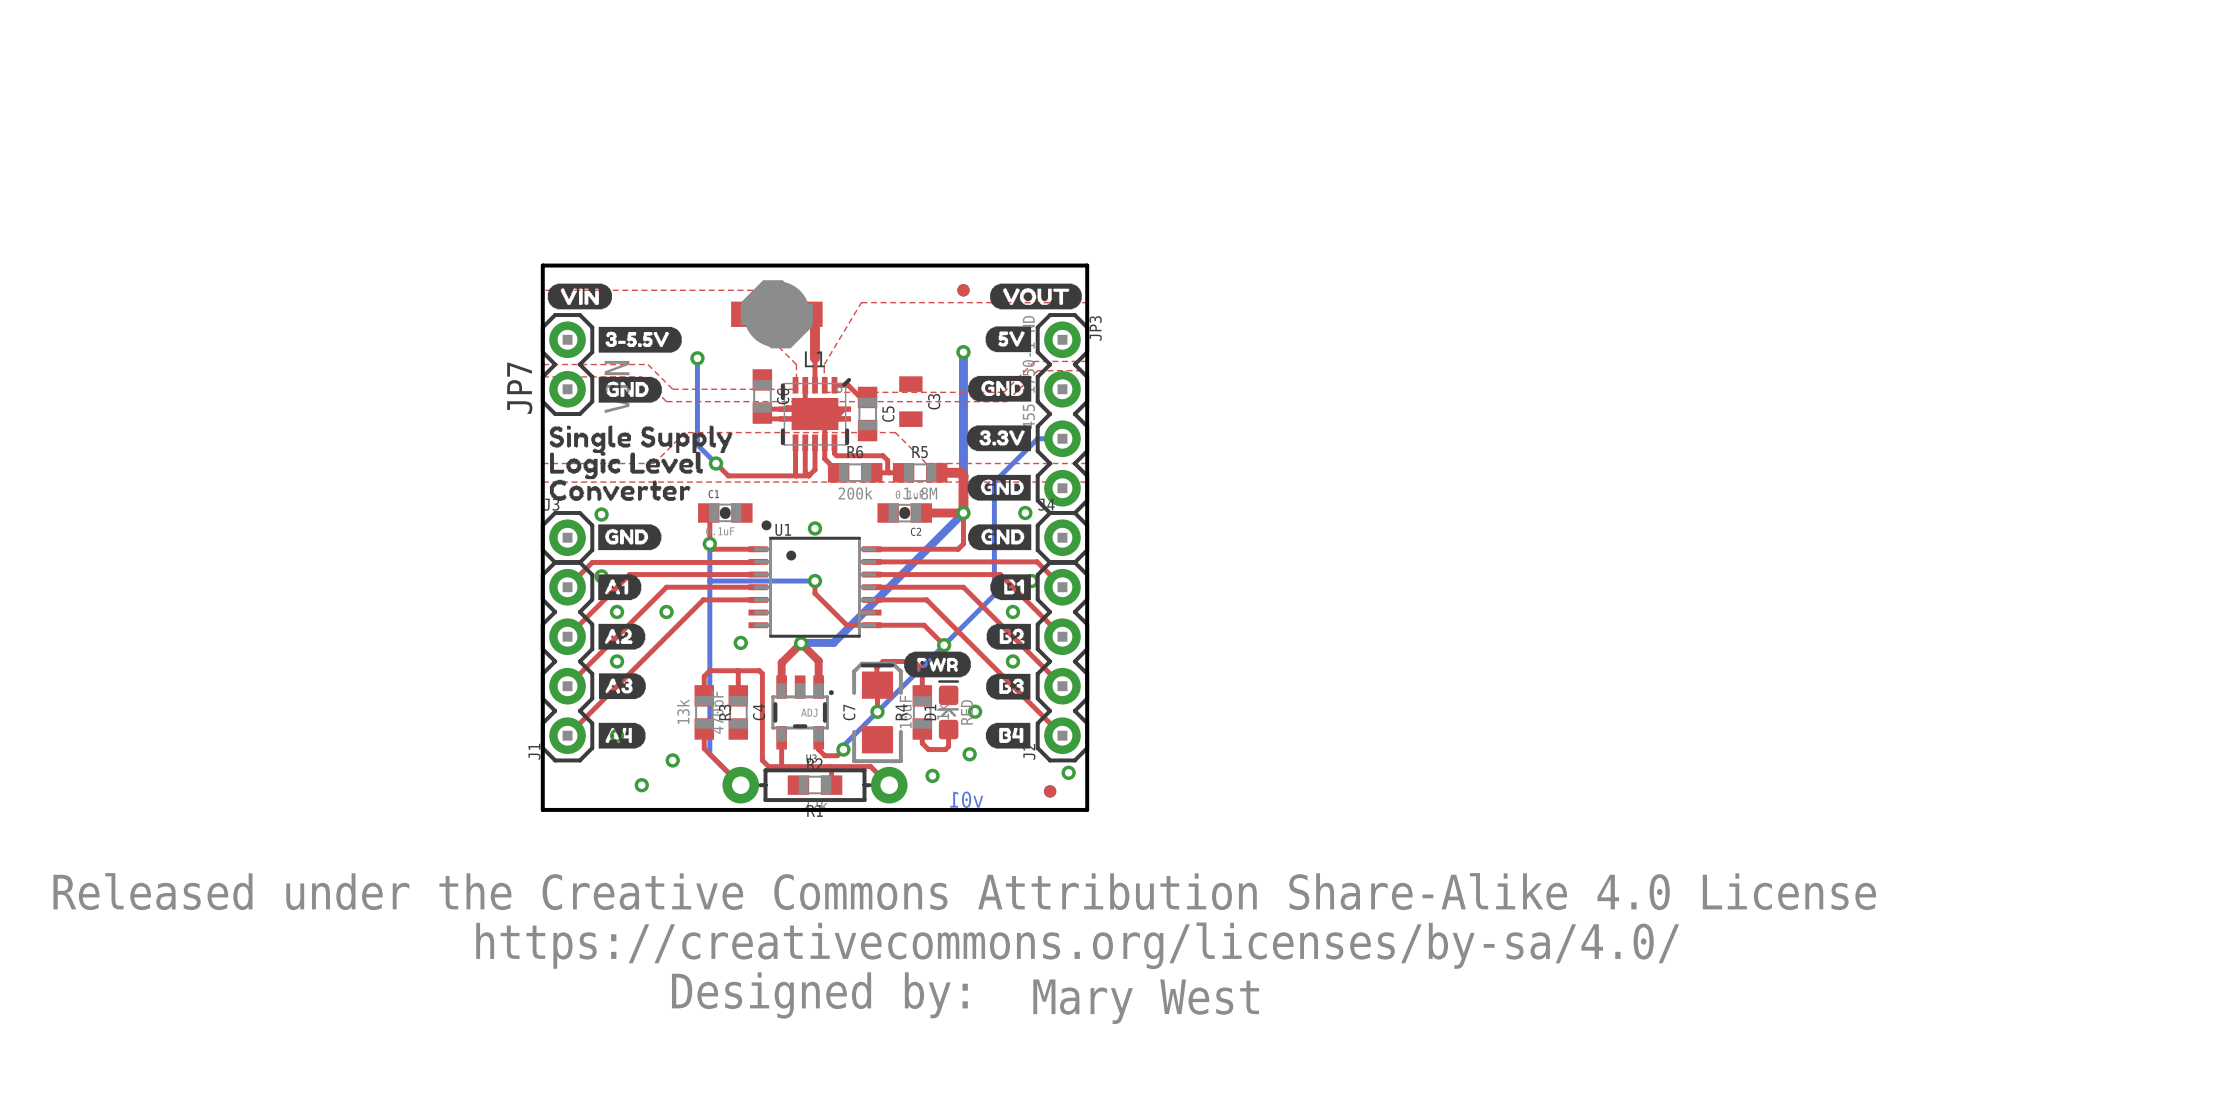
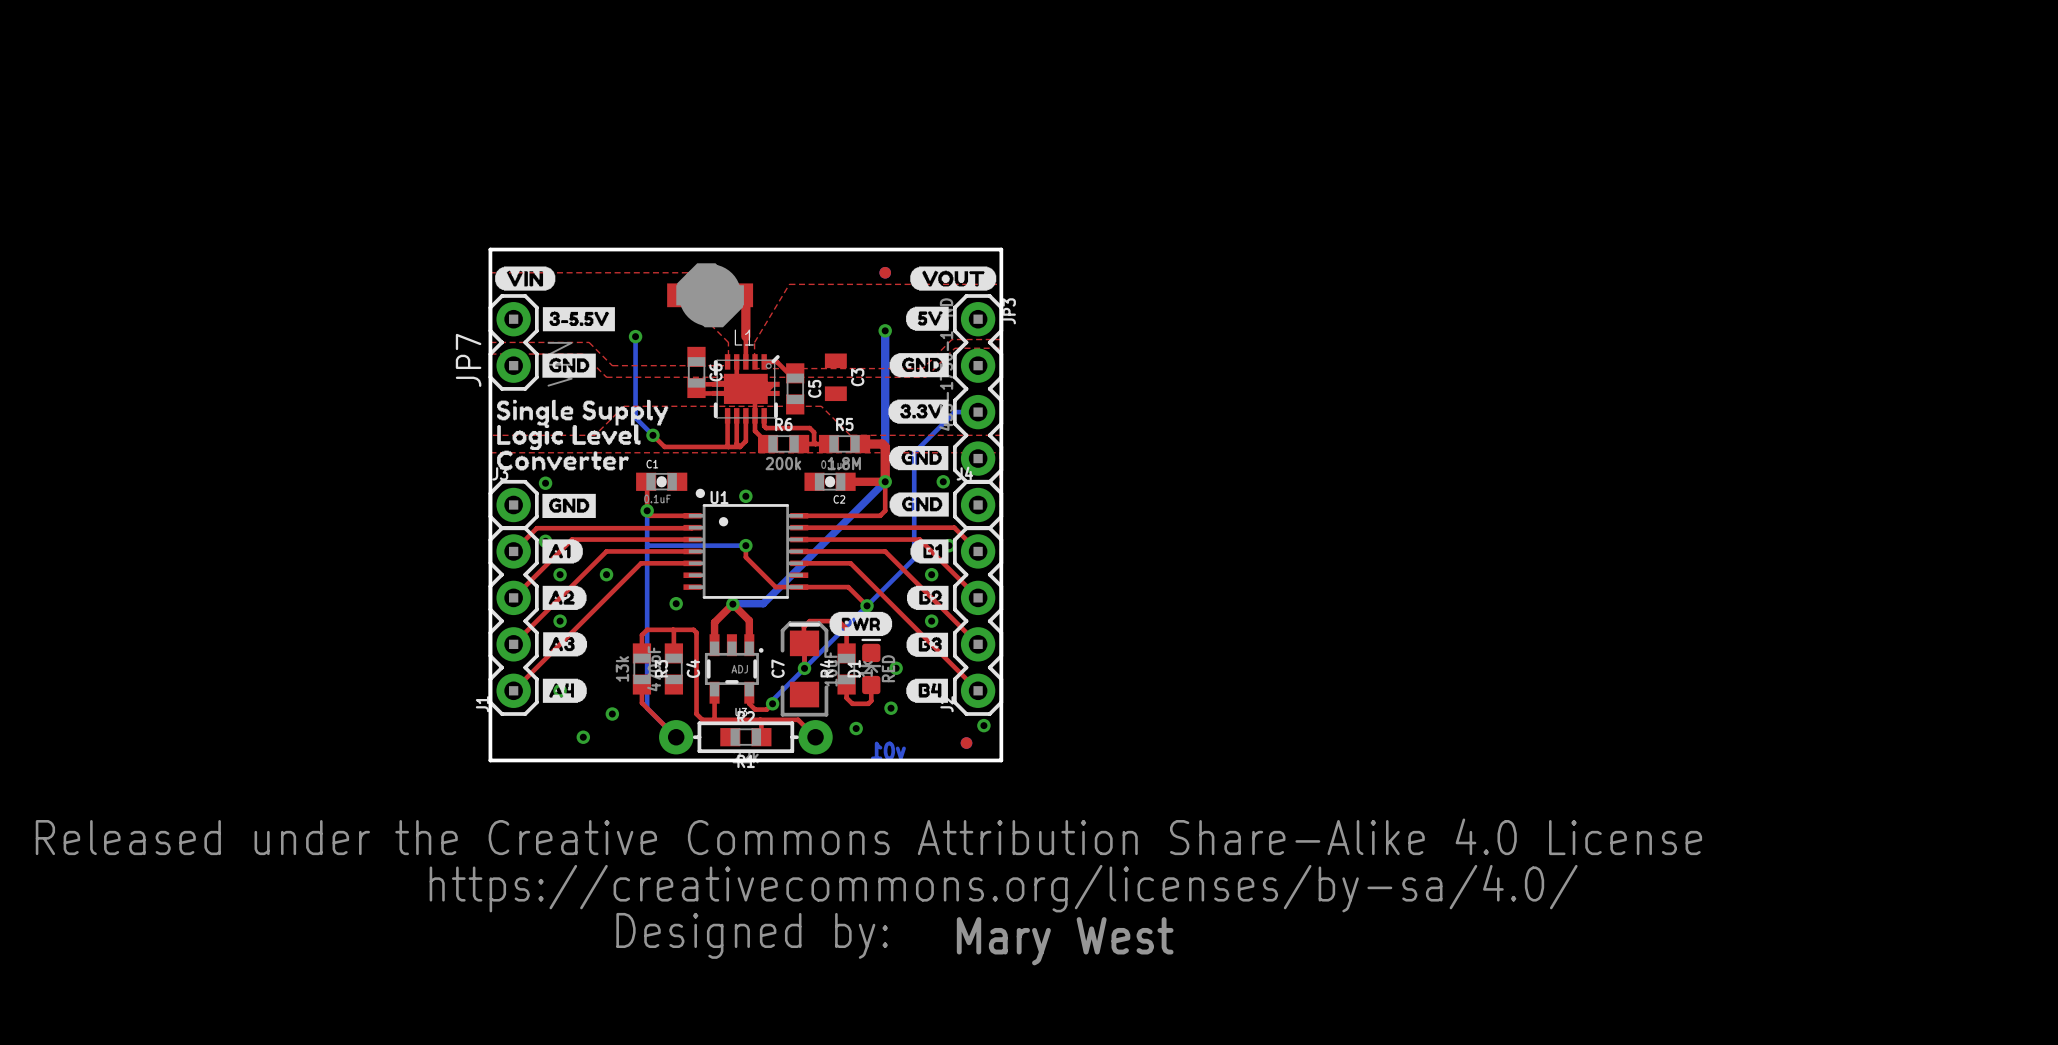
drawing shape: [598, 326, 682, 353] -> [542, 307, 615, 332]
drawing shape: [598, 376, 662, 403] -> [542, 353, 596, 378]
drawing shape: [598, 524, 662, 551] -> [542, 493, 596, 519]

